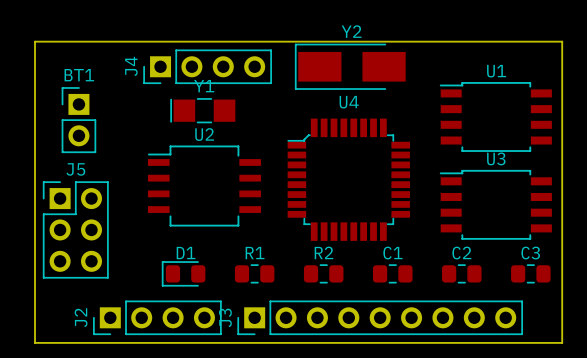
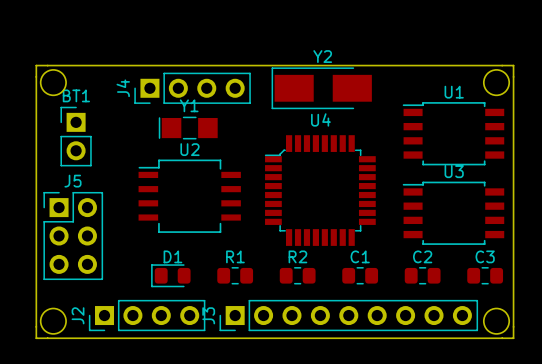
round board edge: none -> [39, 69, 67, 97]
round board edge: none -> [482, 69, 511, 97]
round board edge: none -> [39, 307, 67, 335]
round board edge: none -> [482, 307, 511, 335]

